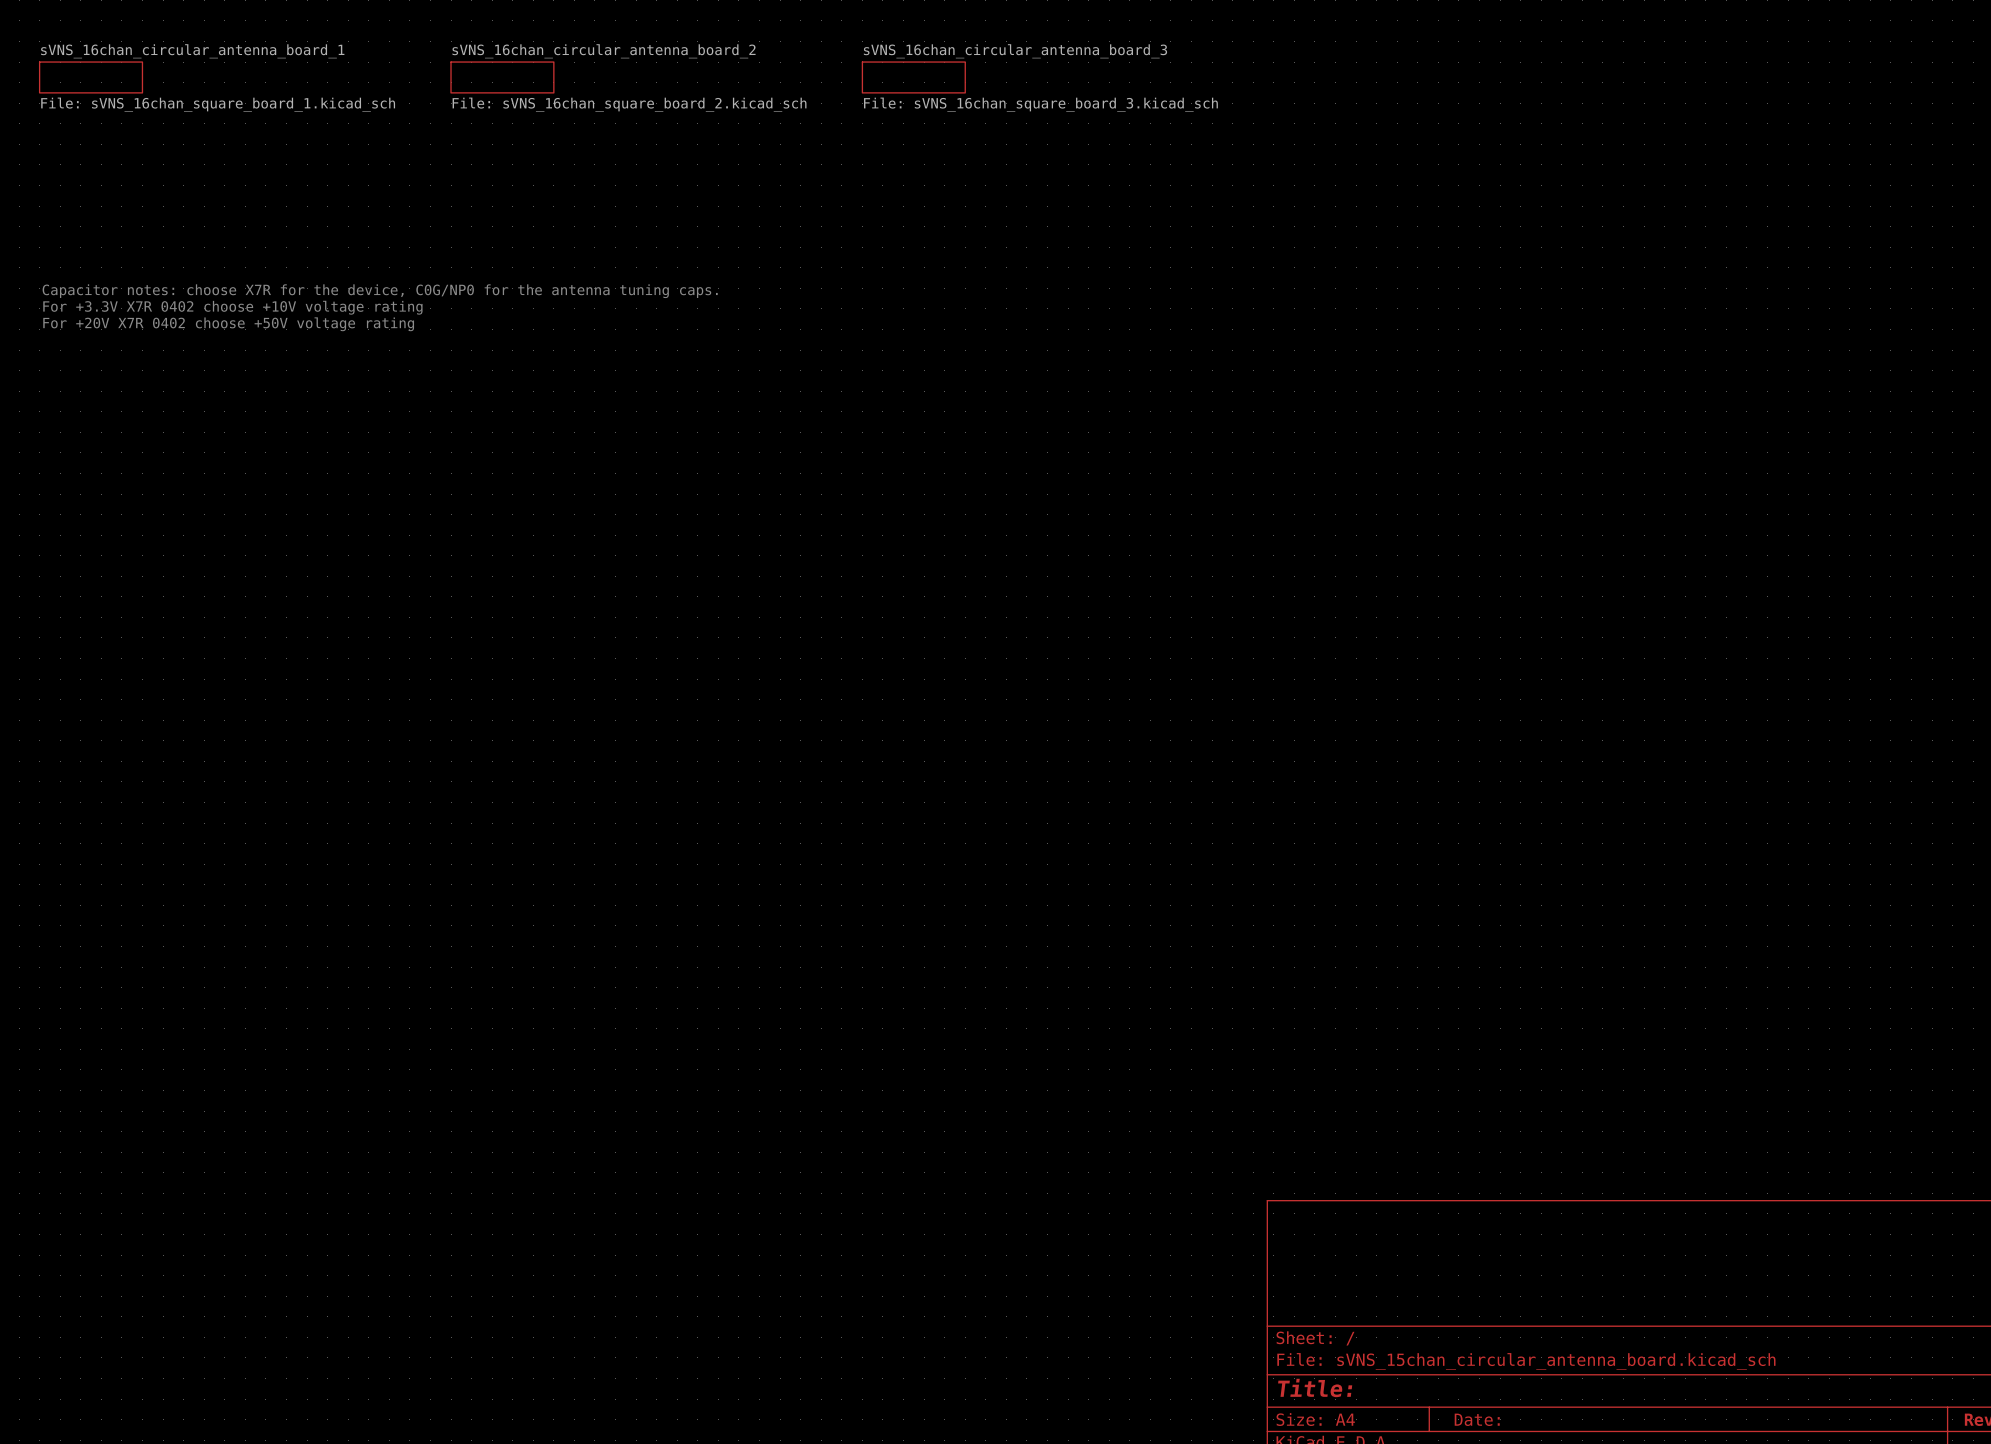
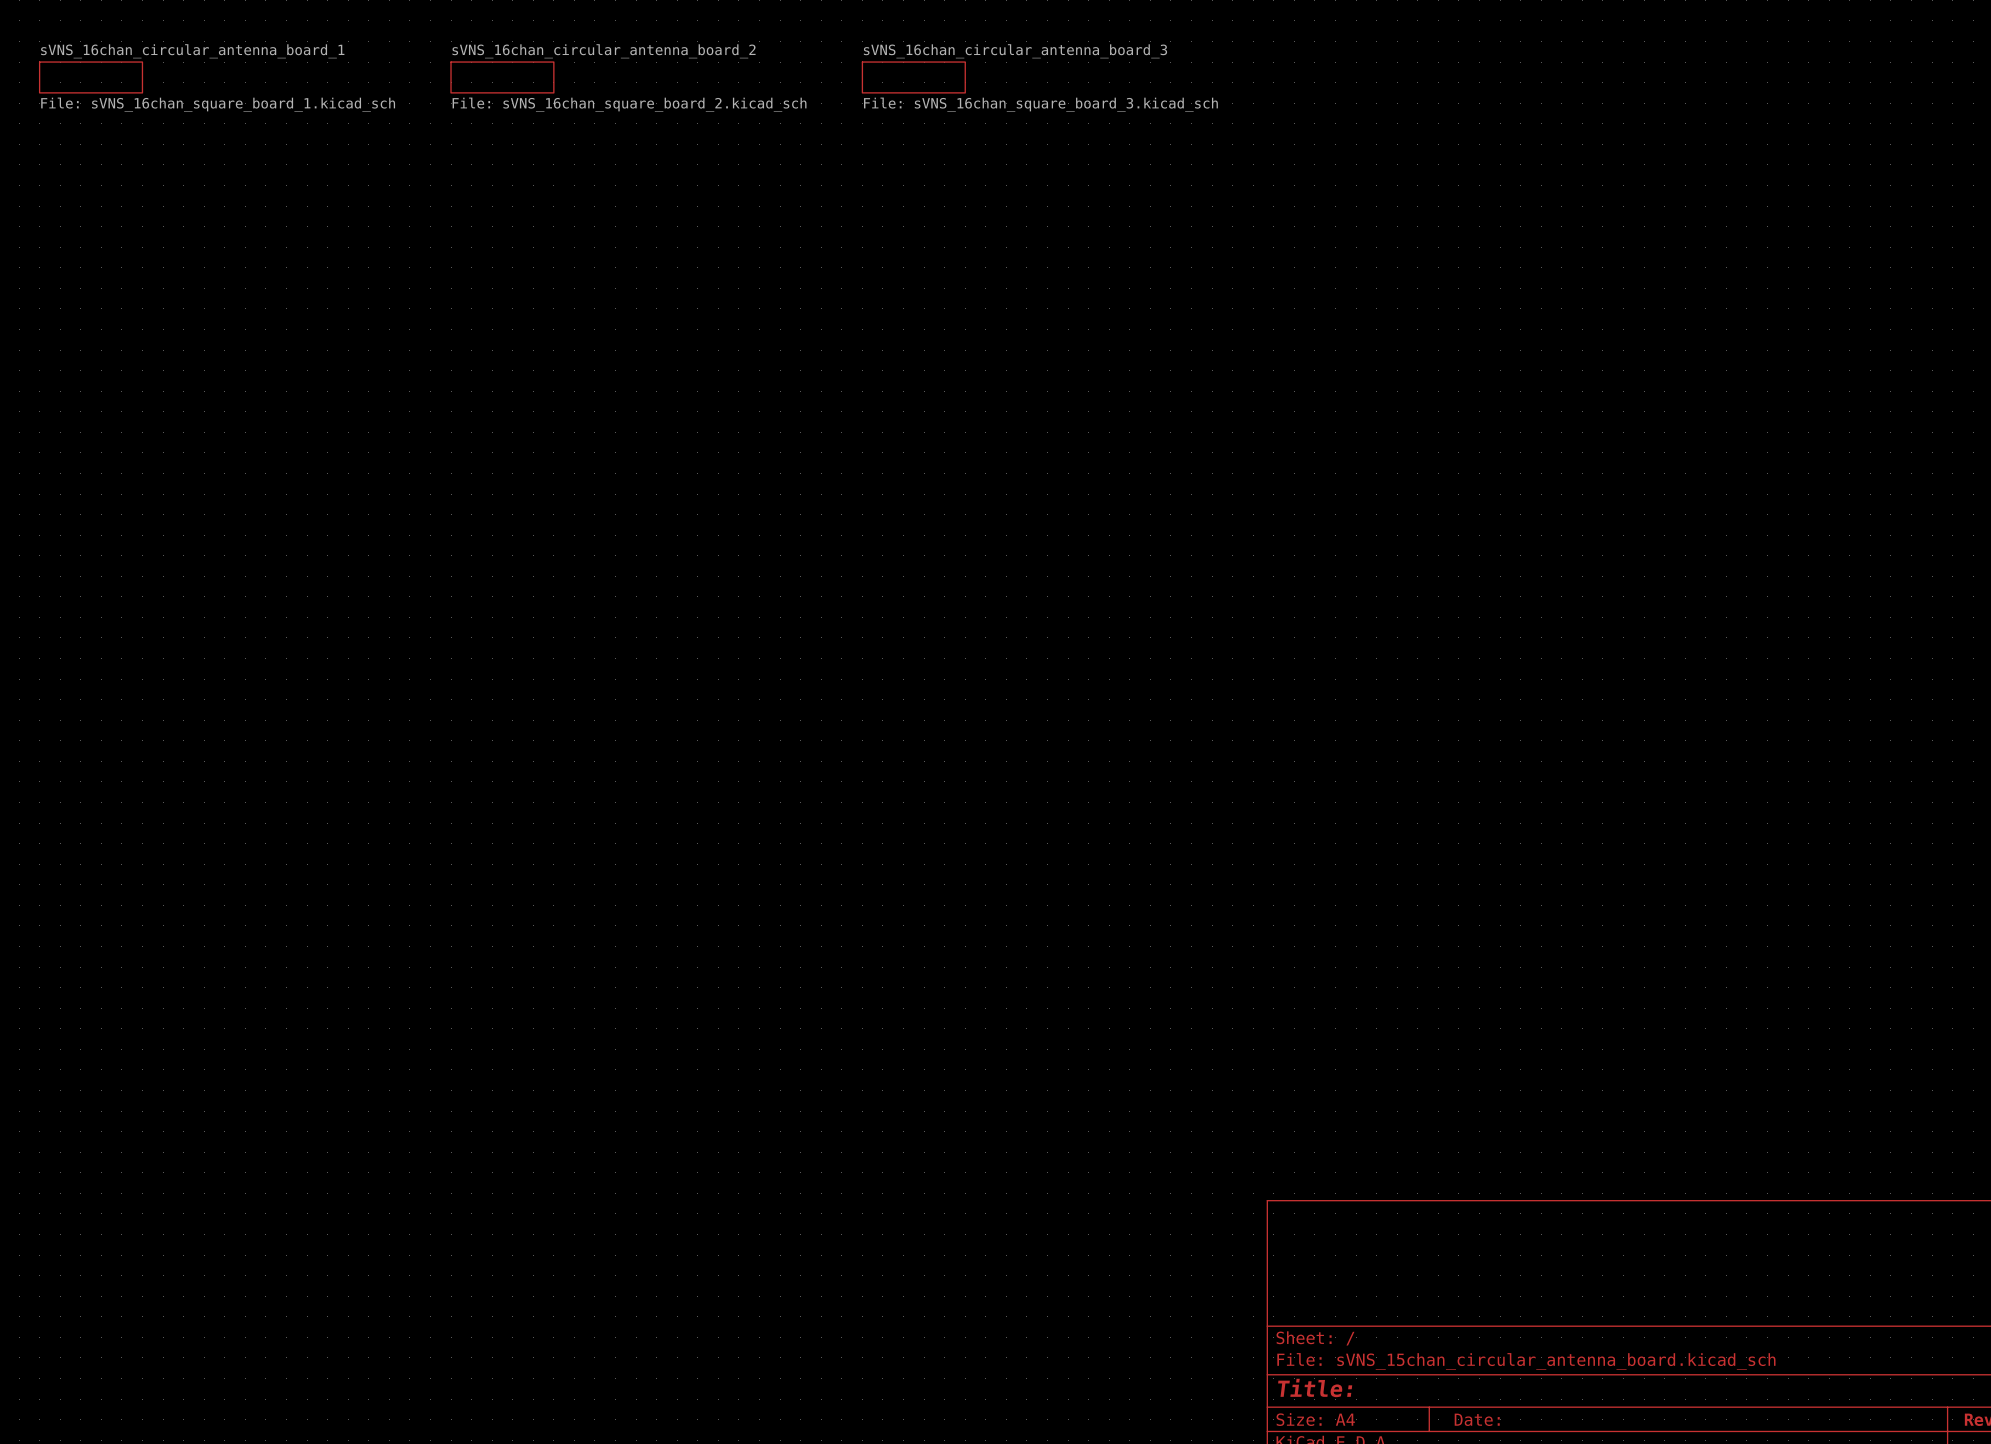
text: Capacitor notes: choose X7R for the device, C0G/NP0 for the antenna tuning caps. (380, 291) -> none
text: For +3.3V X7R 0402 choose +10V voltage rating (232, 307) -> none
text: For +20V X7R 0402 choose +50V voltage rating (228, 324) -> none

